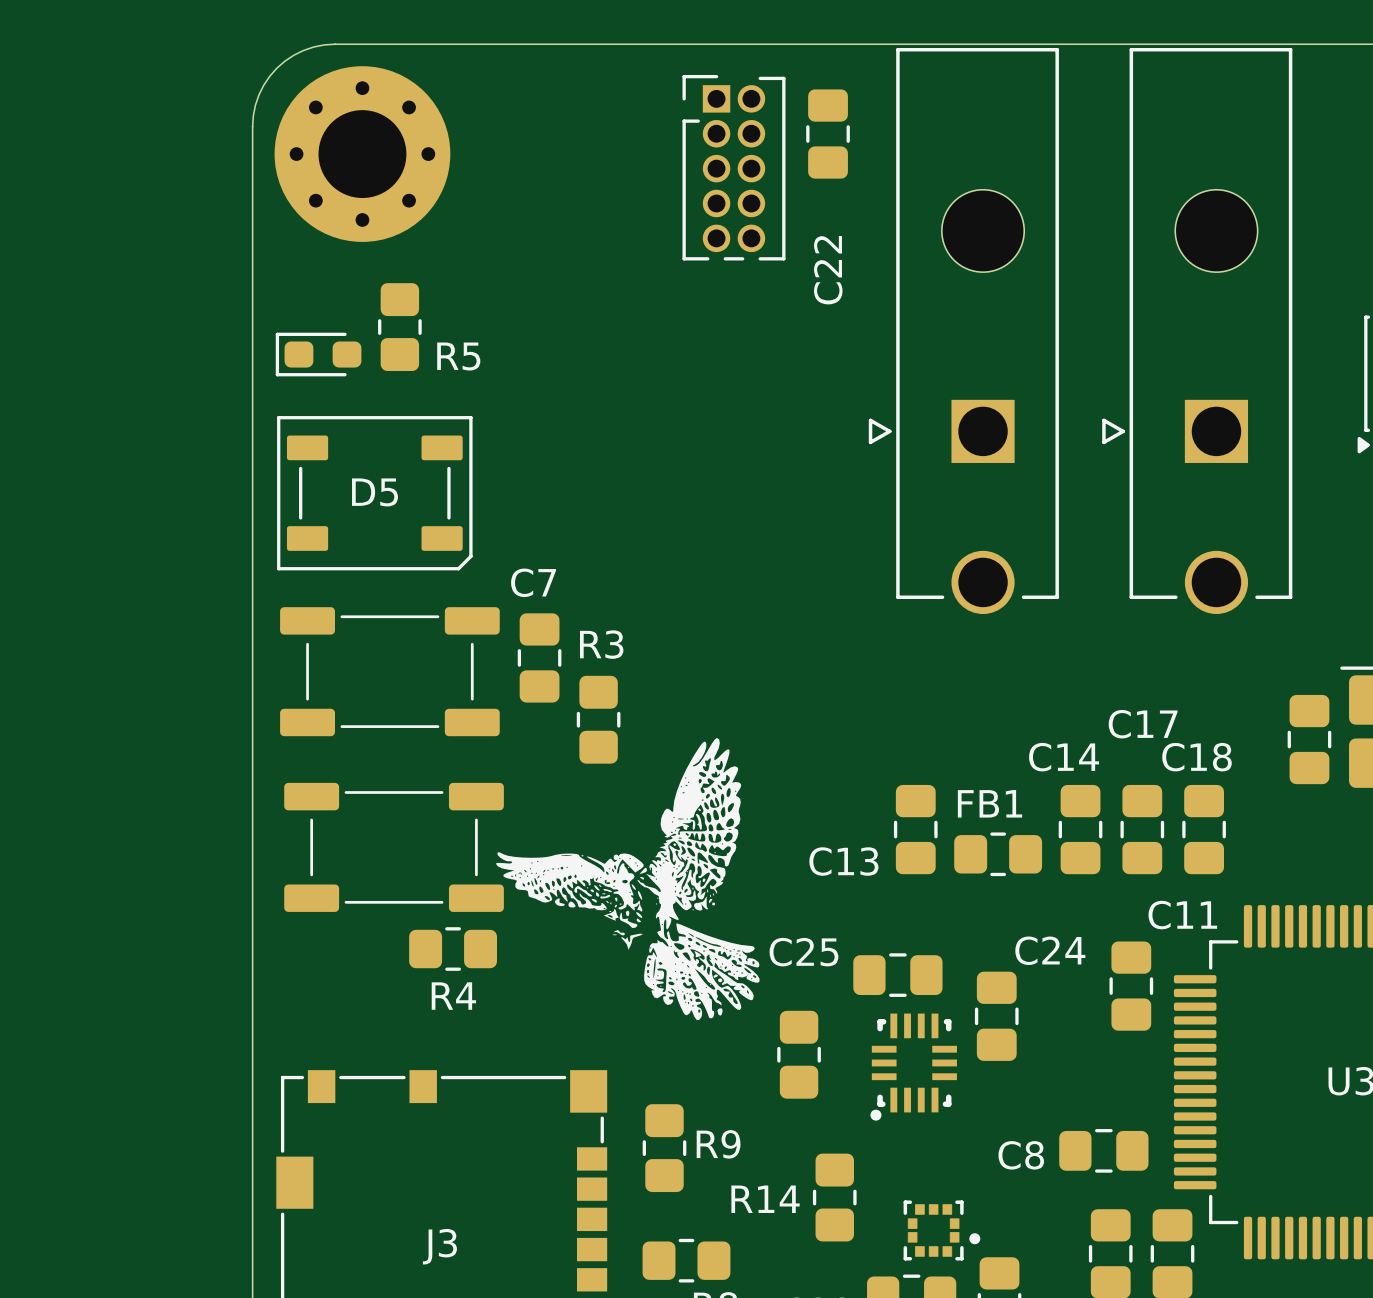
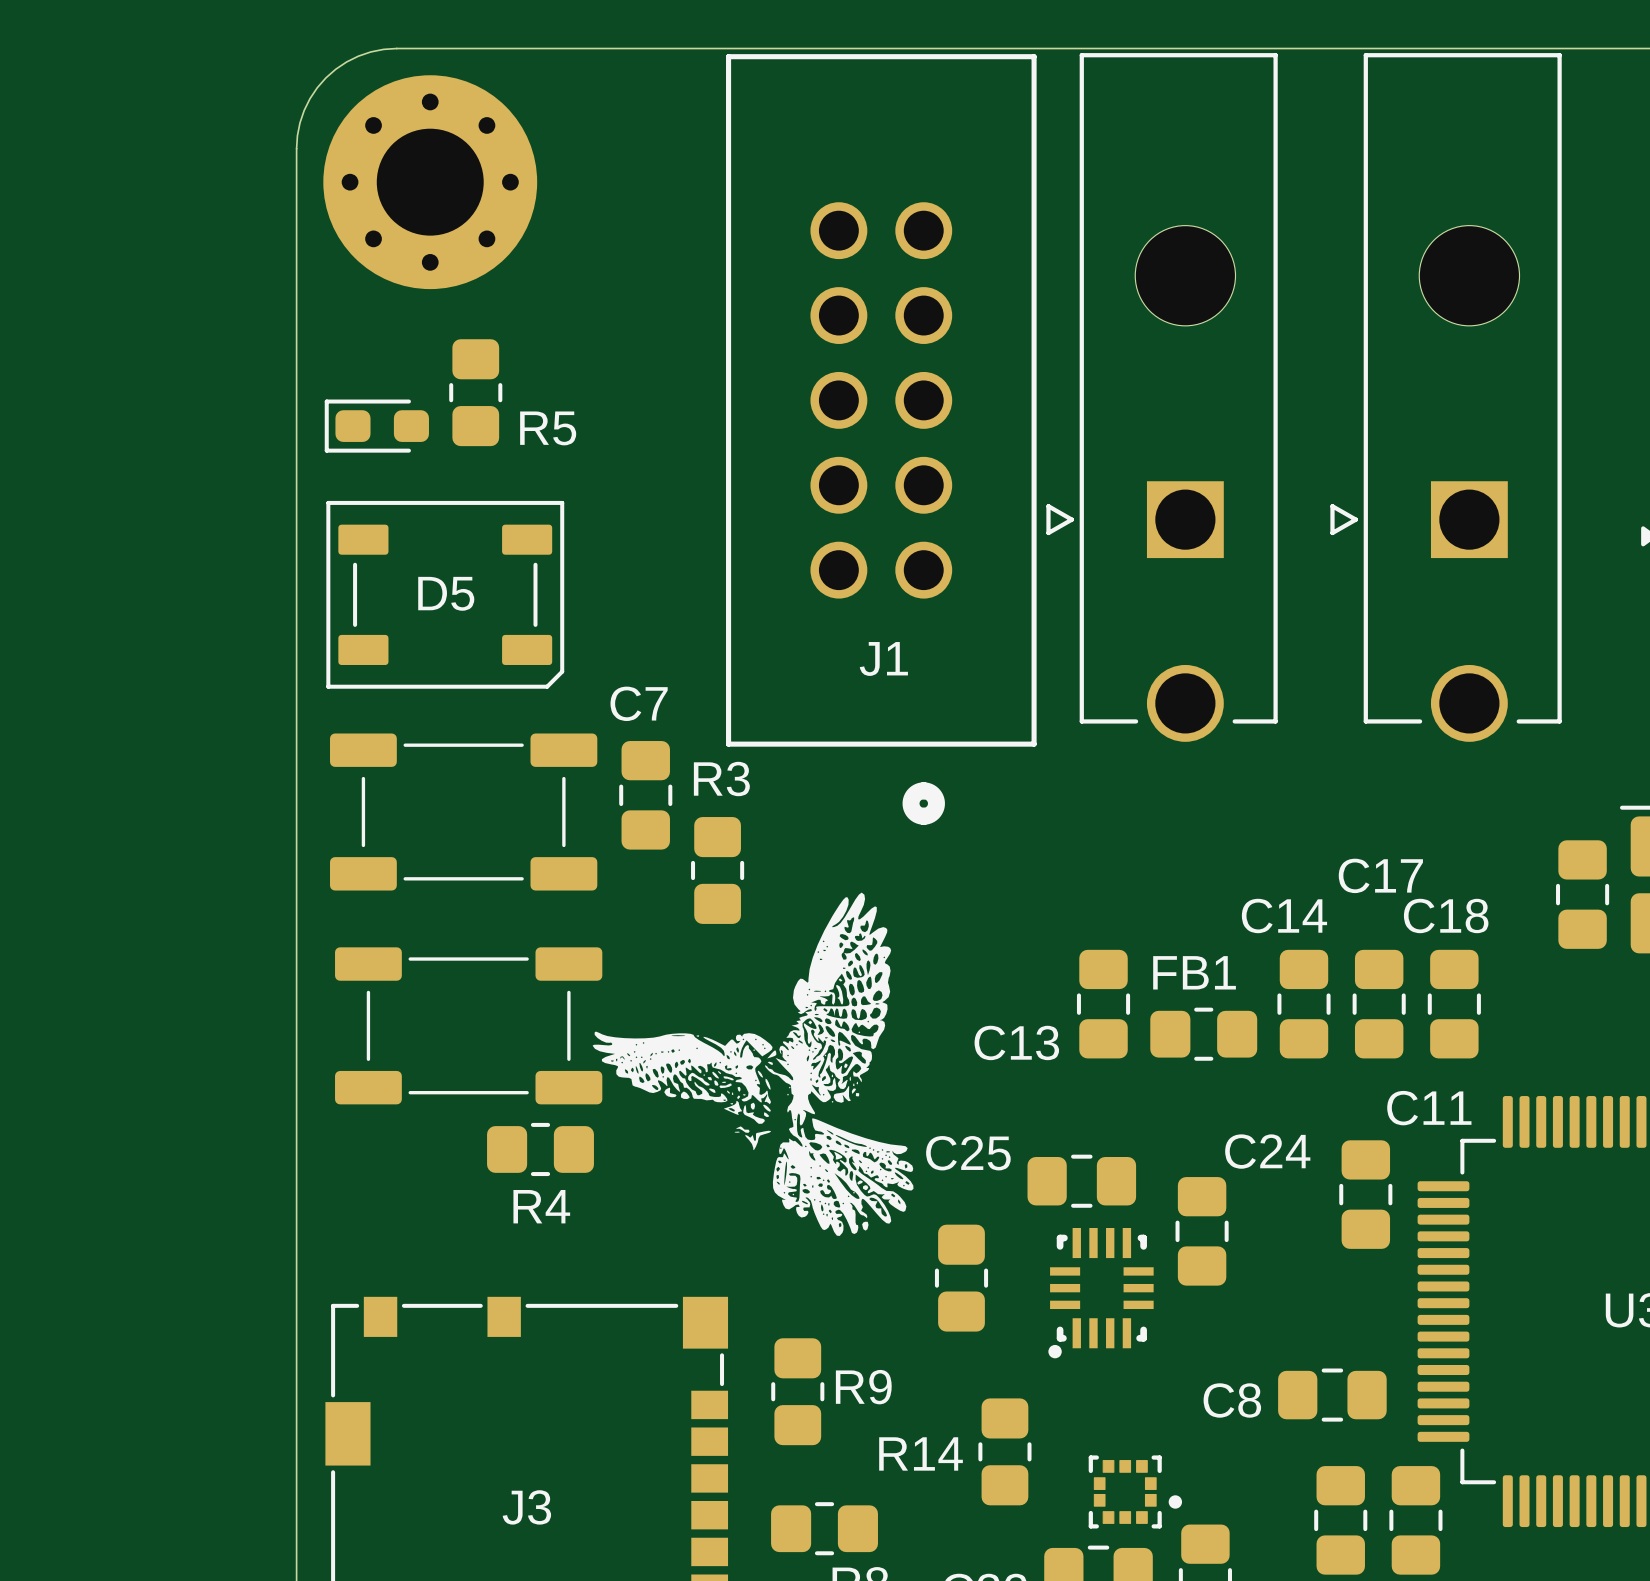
C22: (828, 134) -> none
part: (733, 167) -> none
J1: none -> (881, 439)

